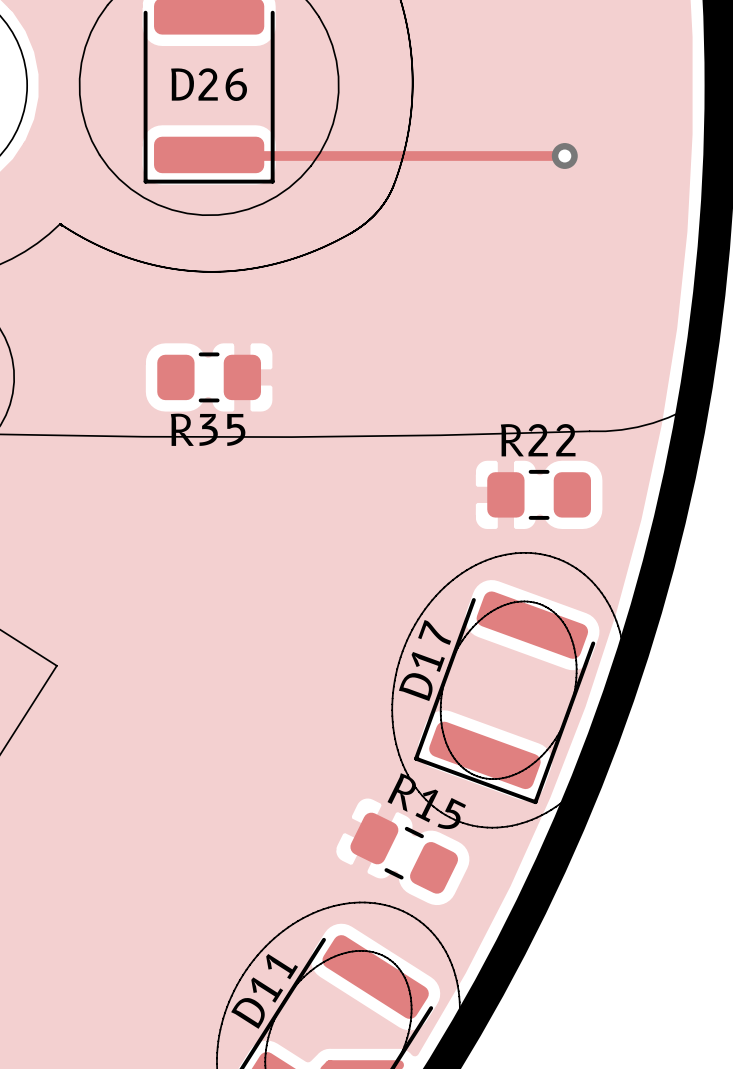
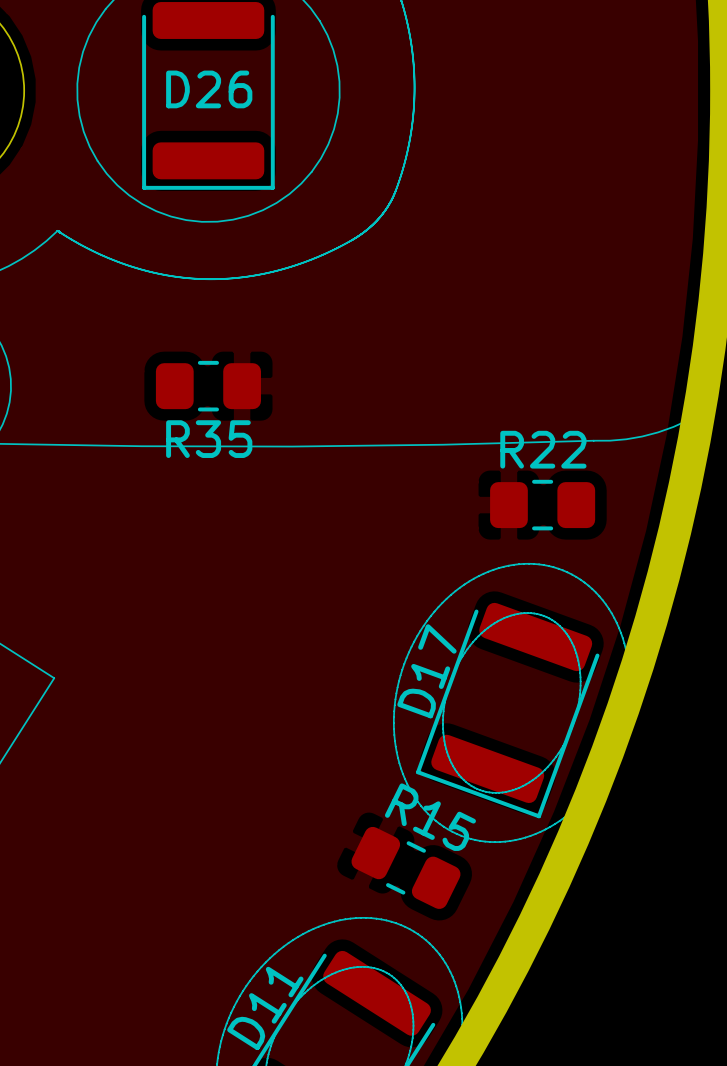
track: (564, 156) (204, 157) -> none
via: (564, 156) -> none

